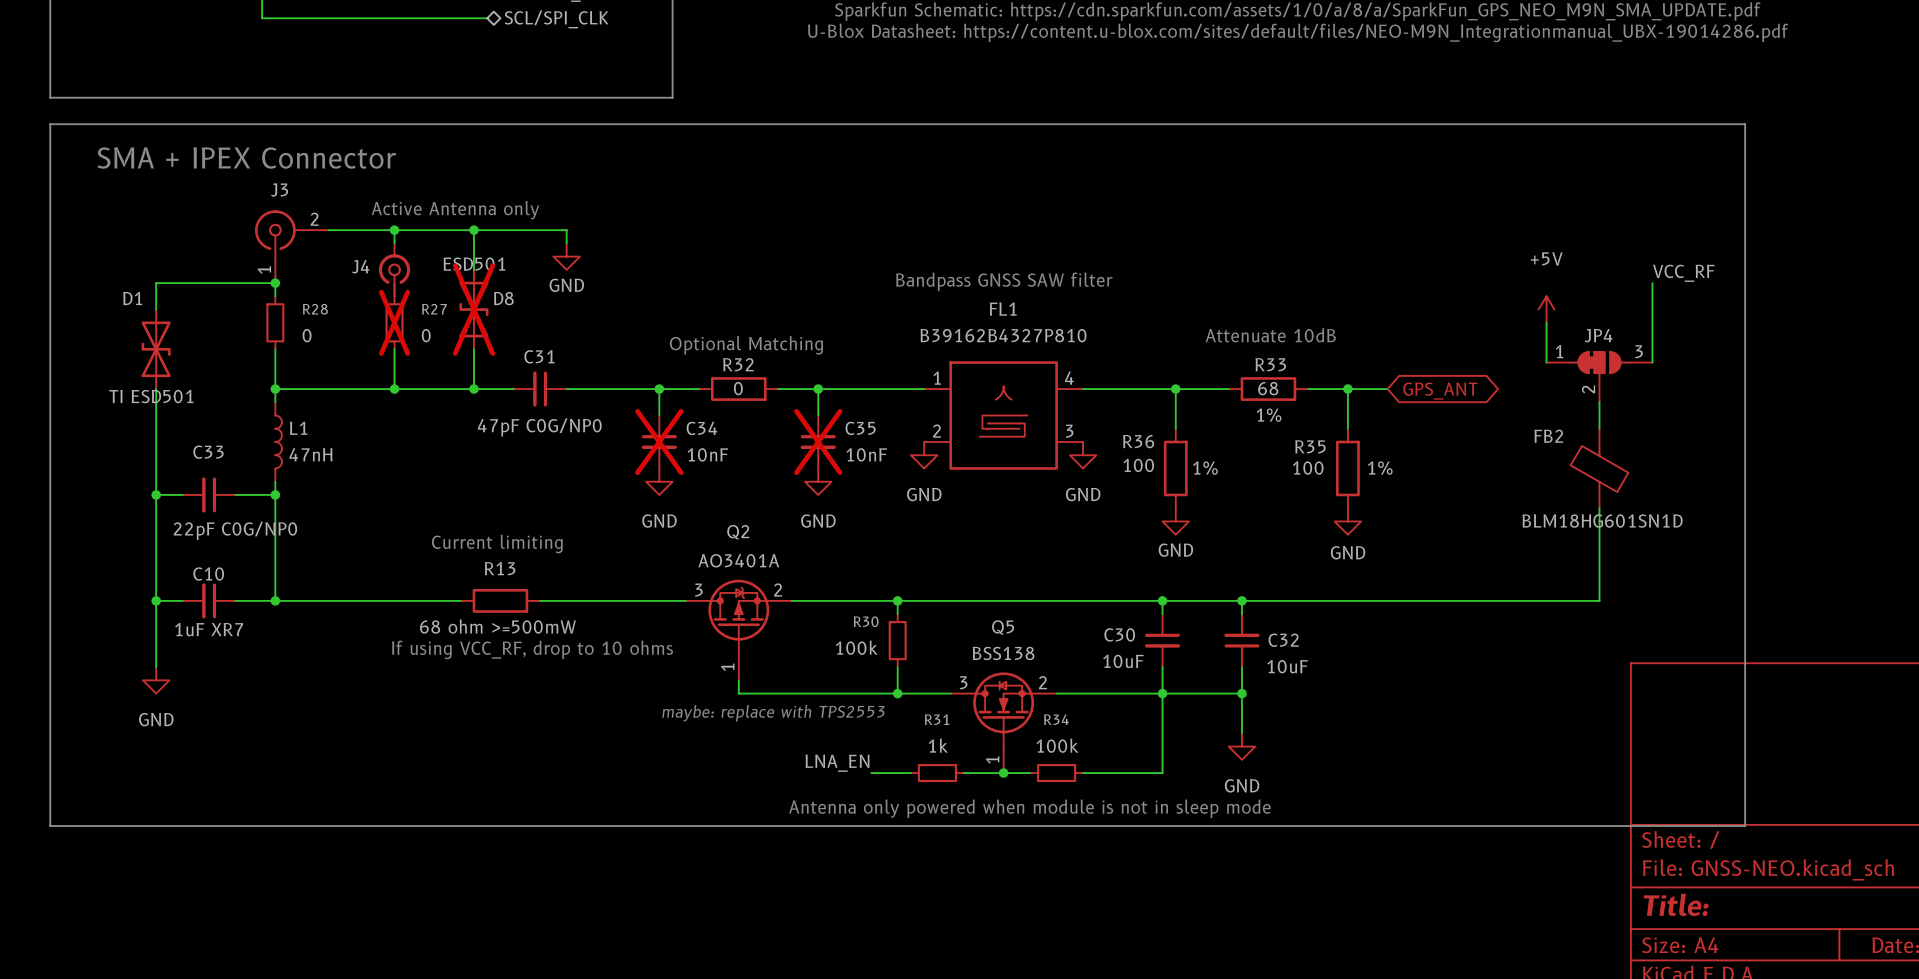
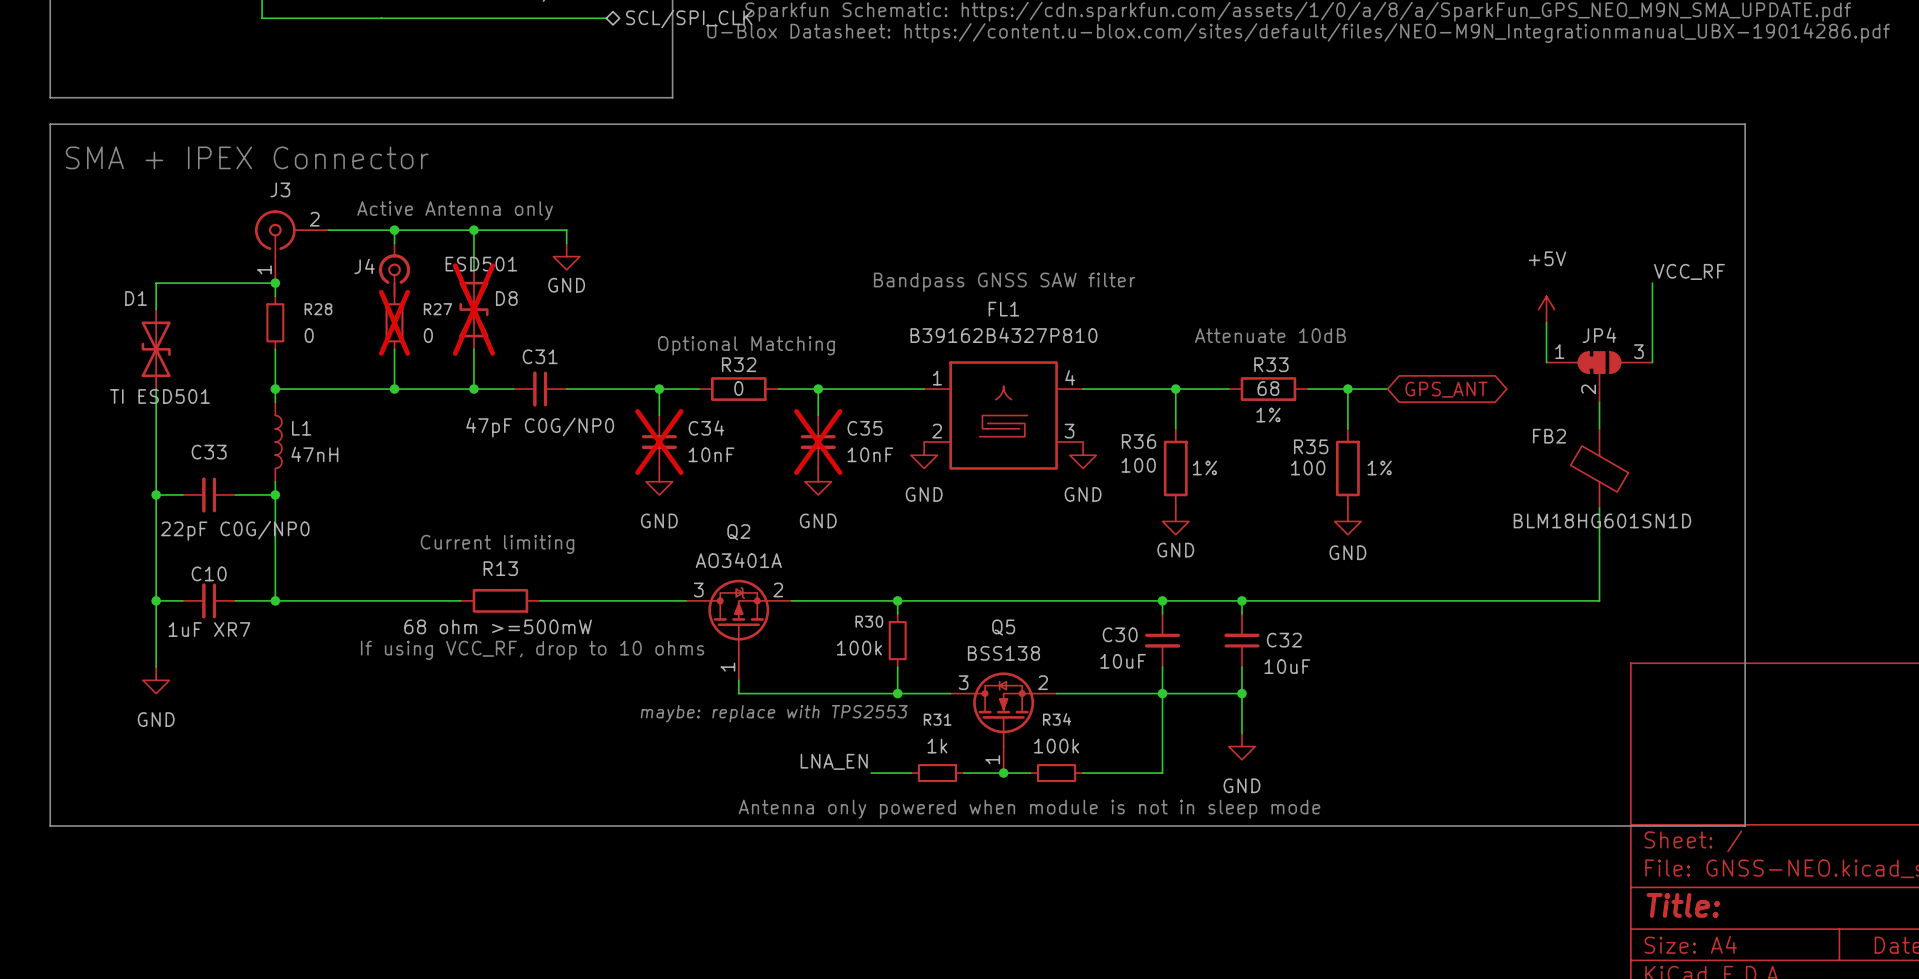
wire: none -> (487, 18) (606, 18)
hierarchical label position: SCL/SPI_CLK (556, 19) -> SCL/SPI_CLK (689, 19)

